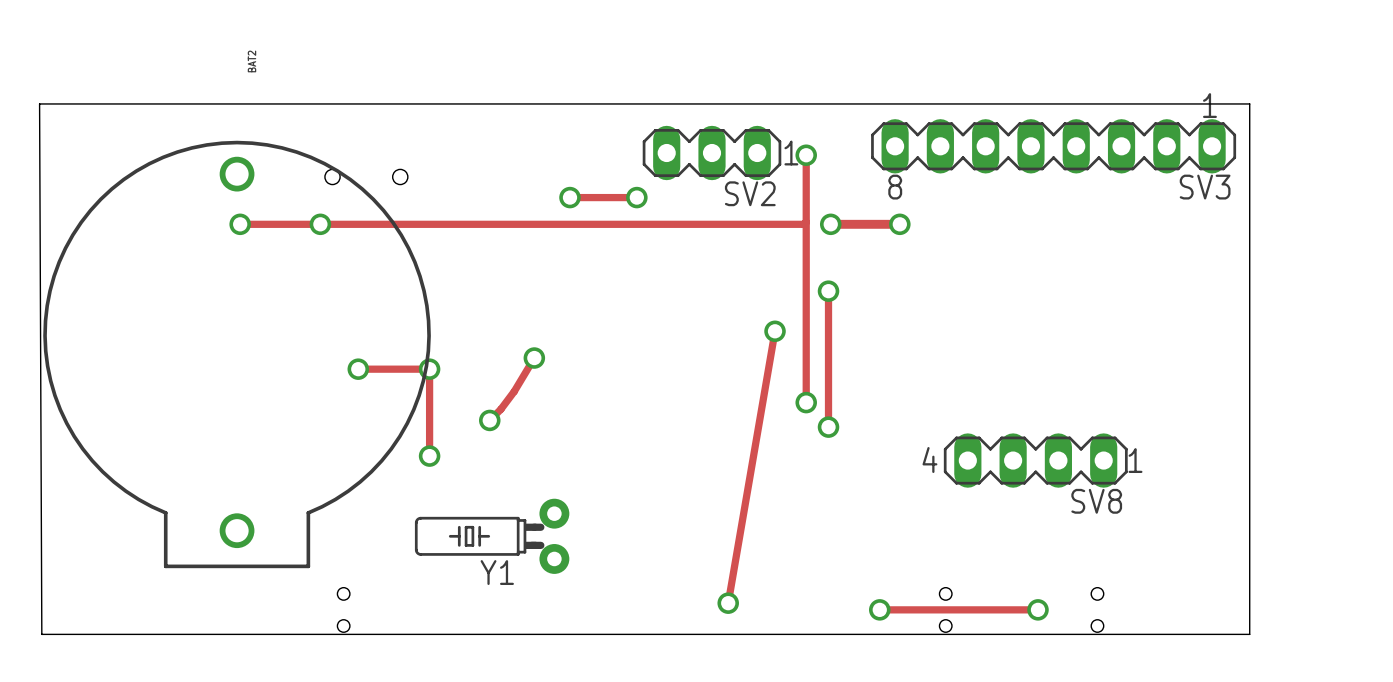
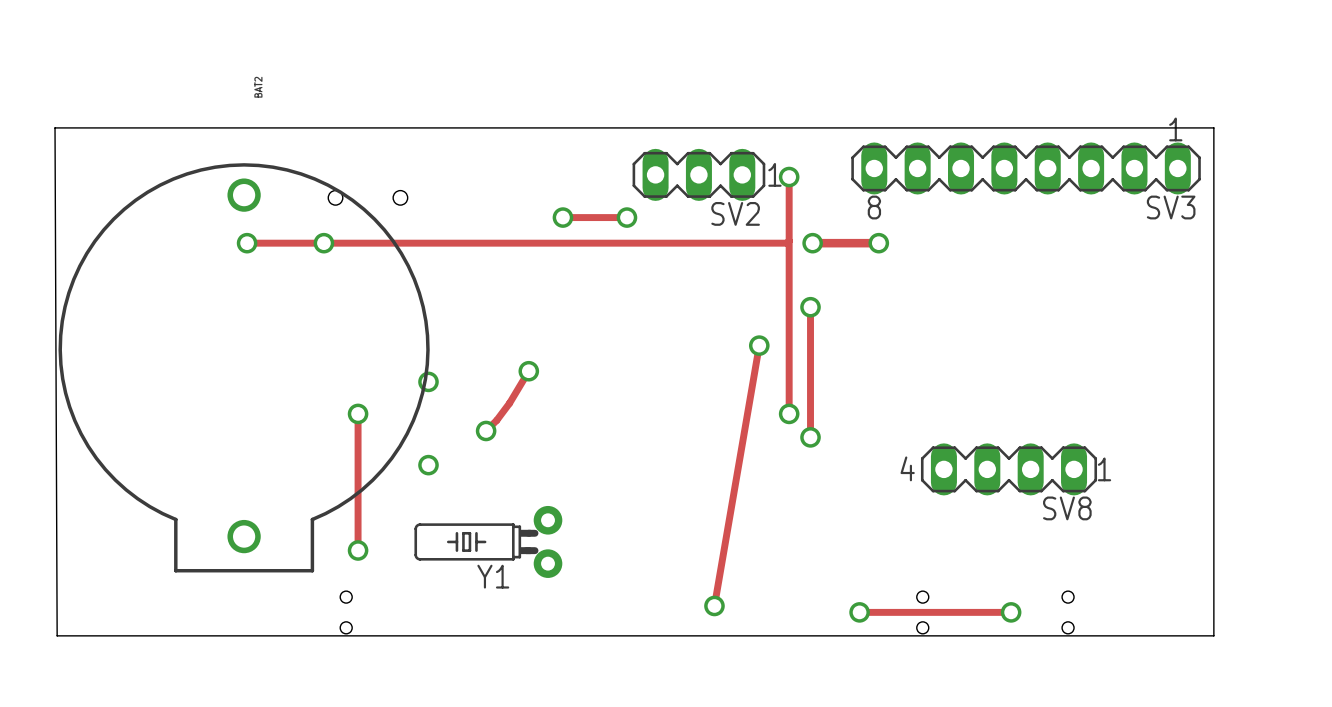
track: (358, 369) (429, 369) (429, 456) -> none
via position: (358, 369) -> (358, 413)
track: none -> (358, 413) (358, 550)
via: none -> (358, 550)

